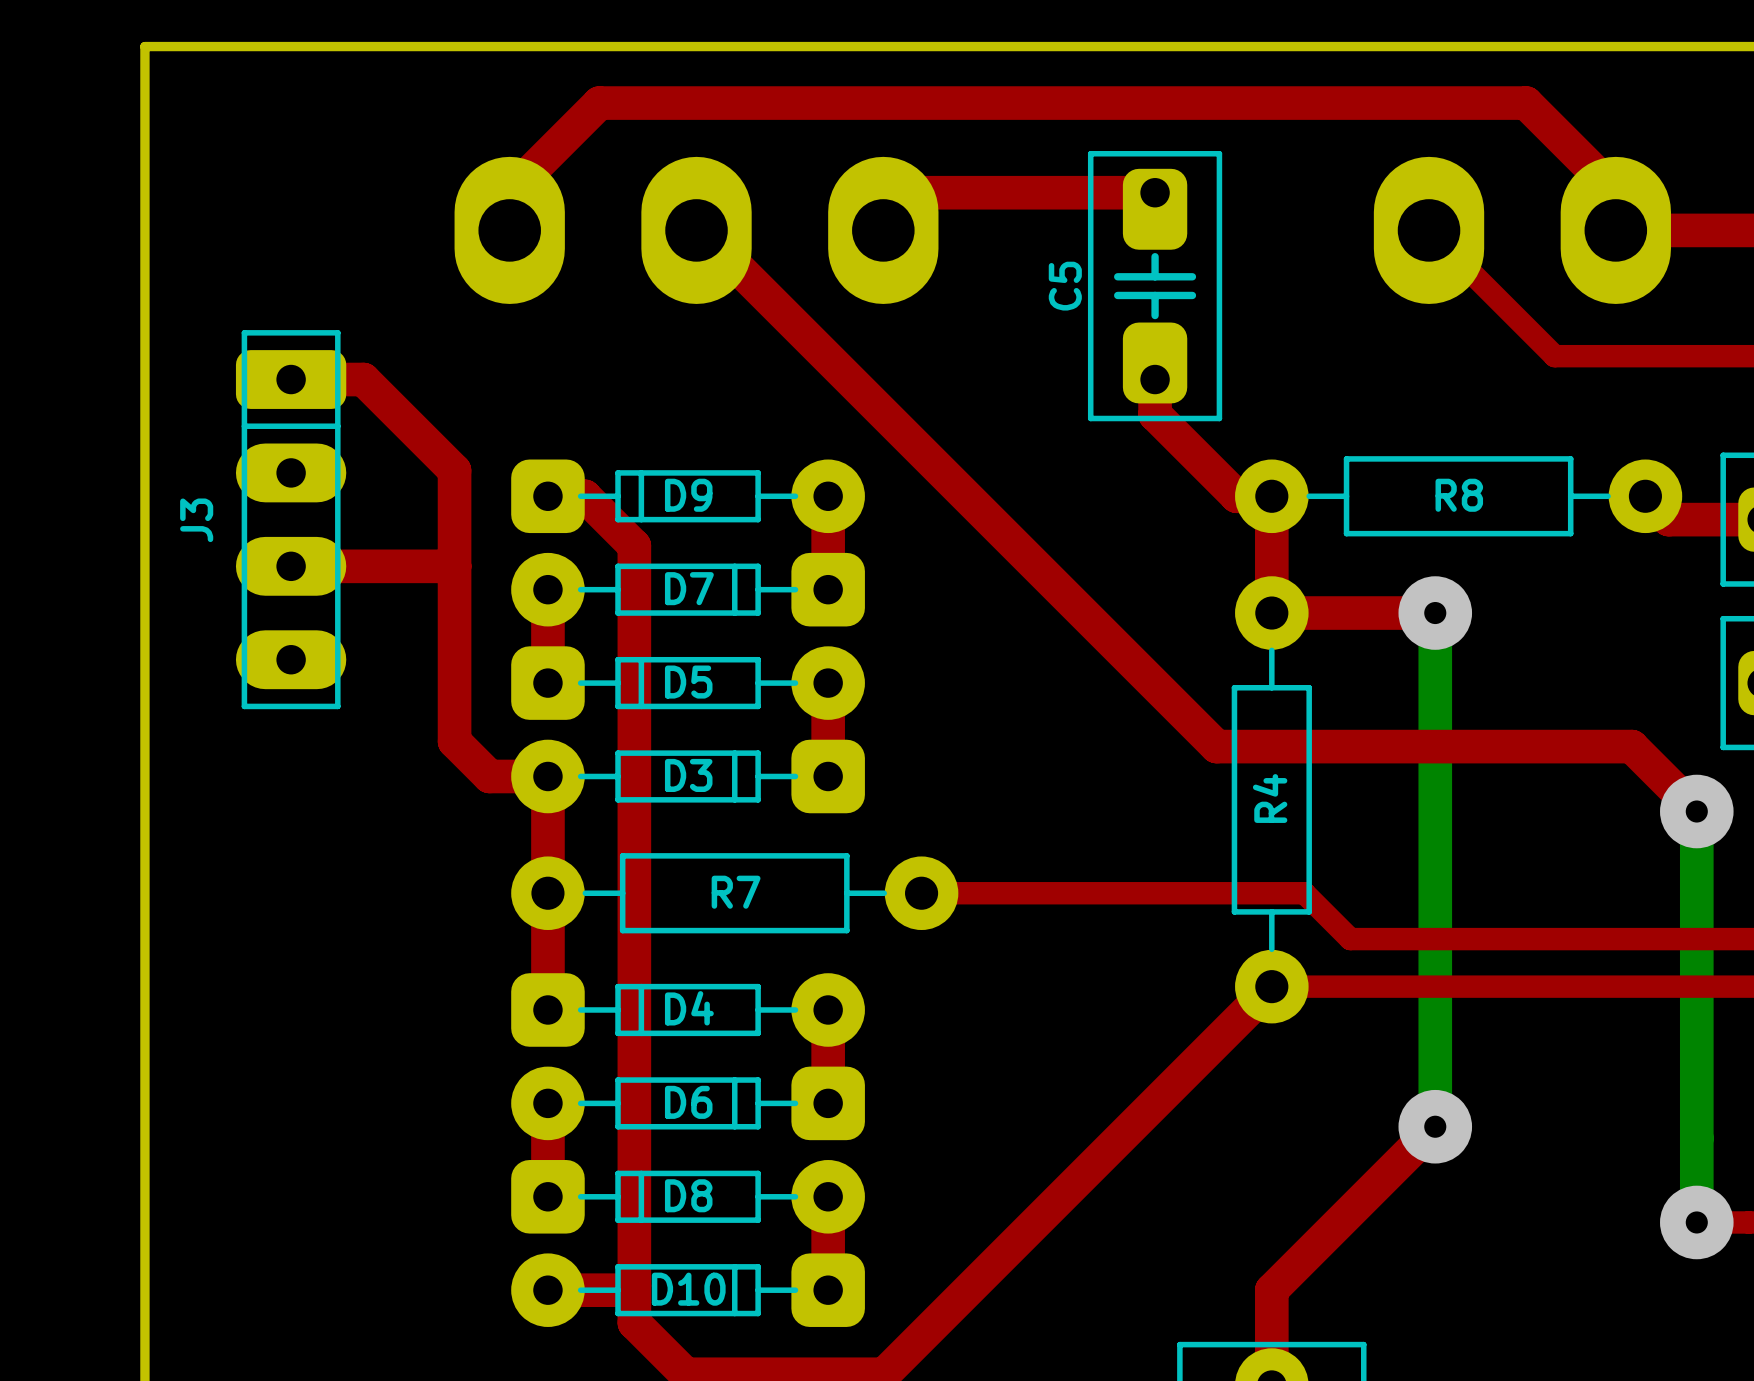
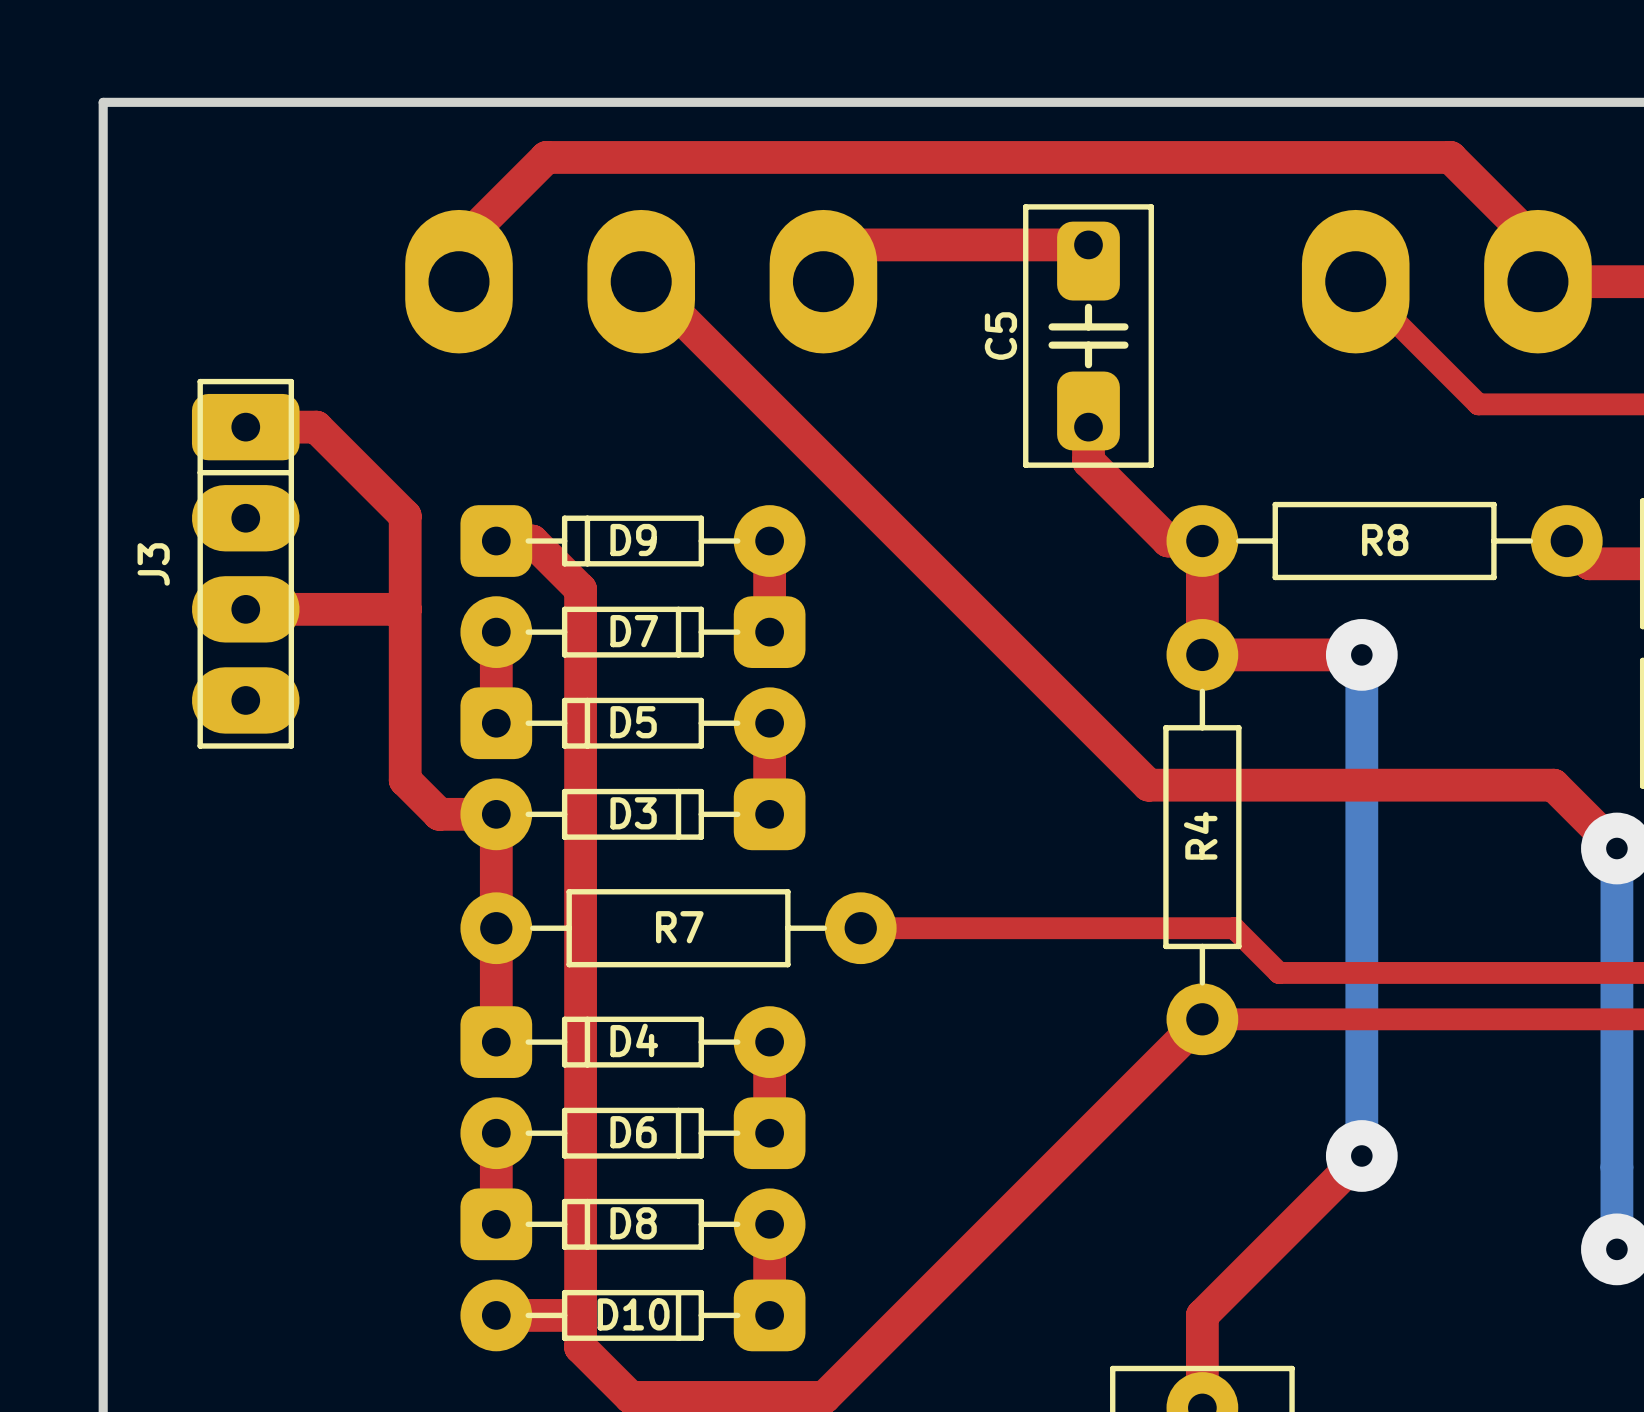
J3 footprint: [235, 330, 347, 710] -> [191, 378, 300, 749]

